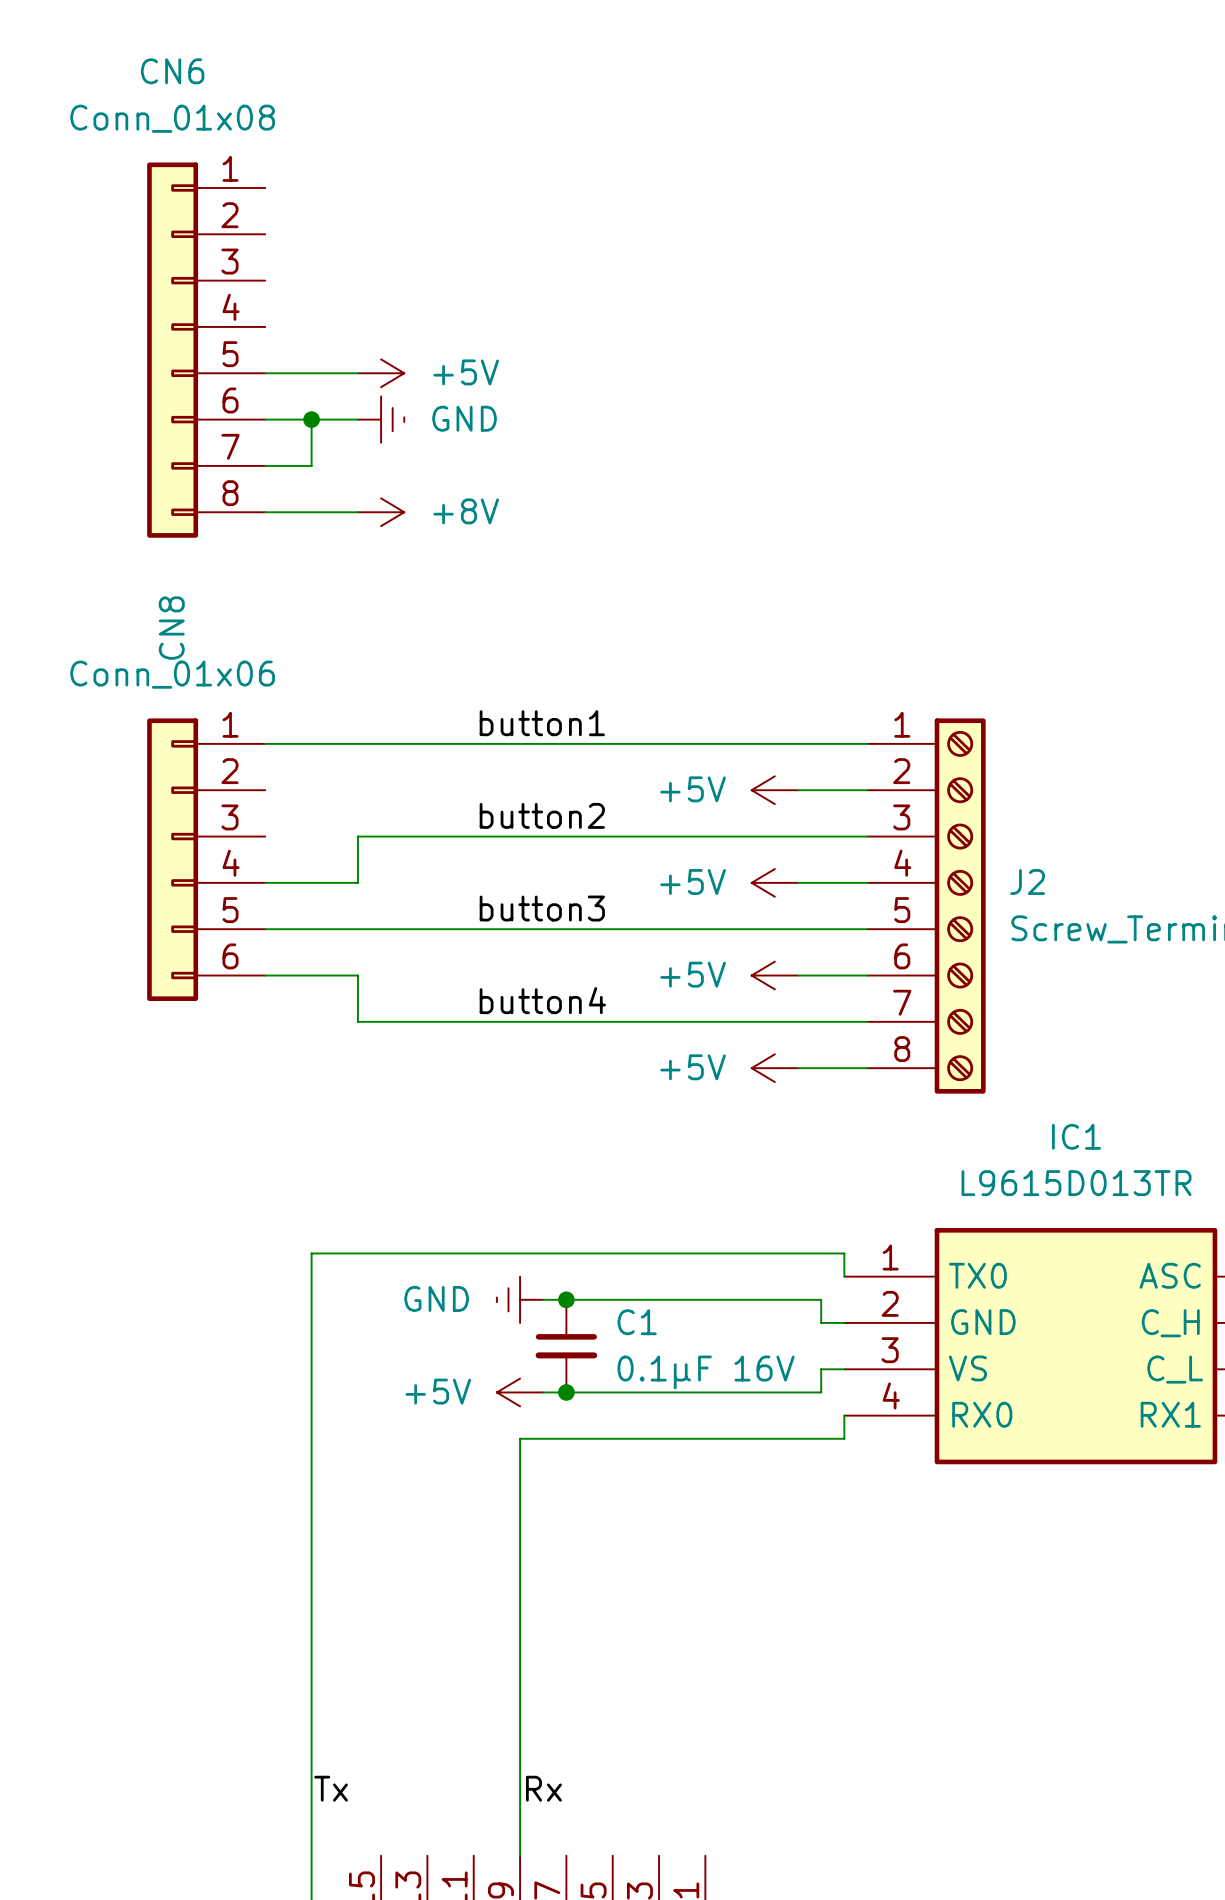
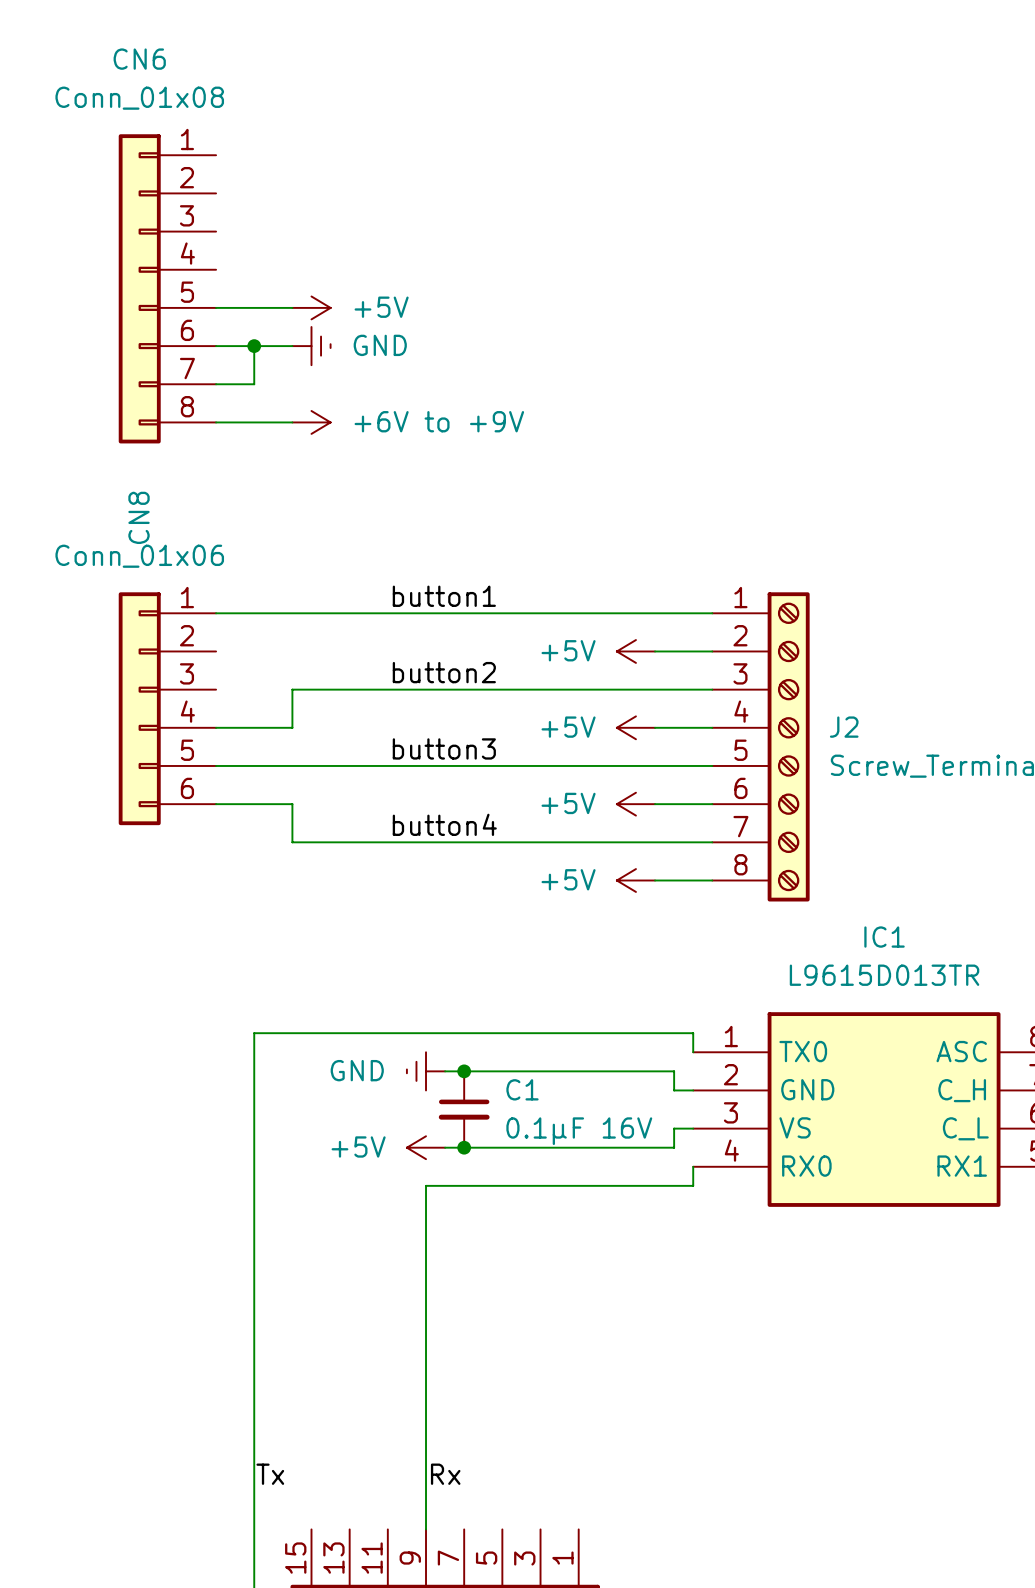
power symbol: +8V (381, 512) -> +6V to +9V (311, 422)

